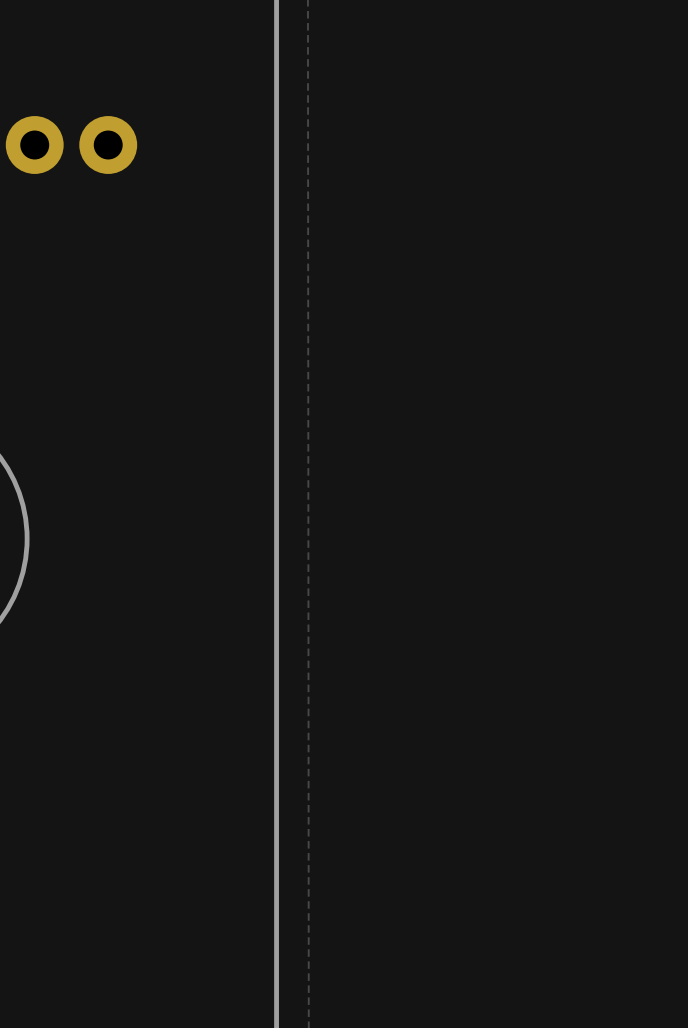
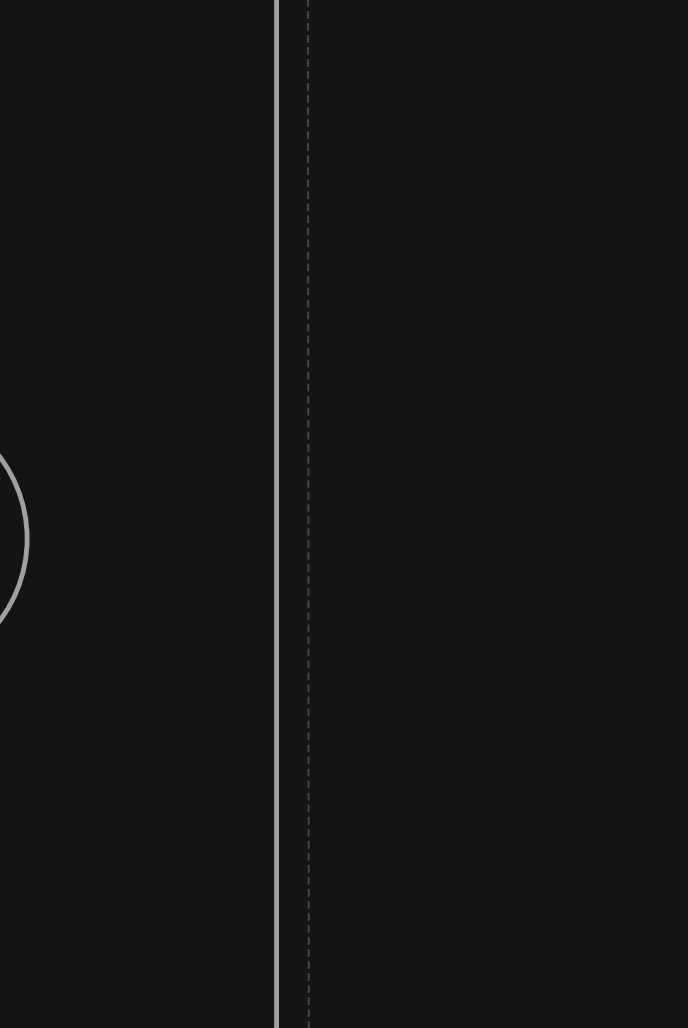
via: (34, 145) -> none
via: (108, 145) -> none

